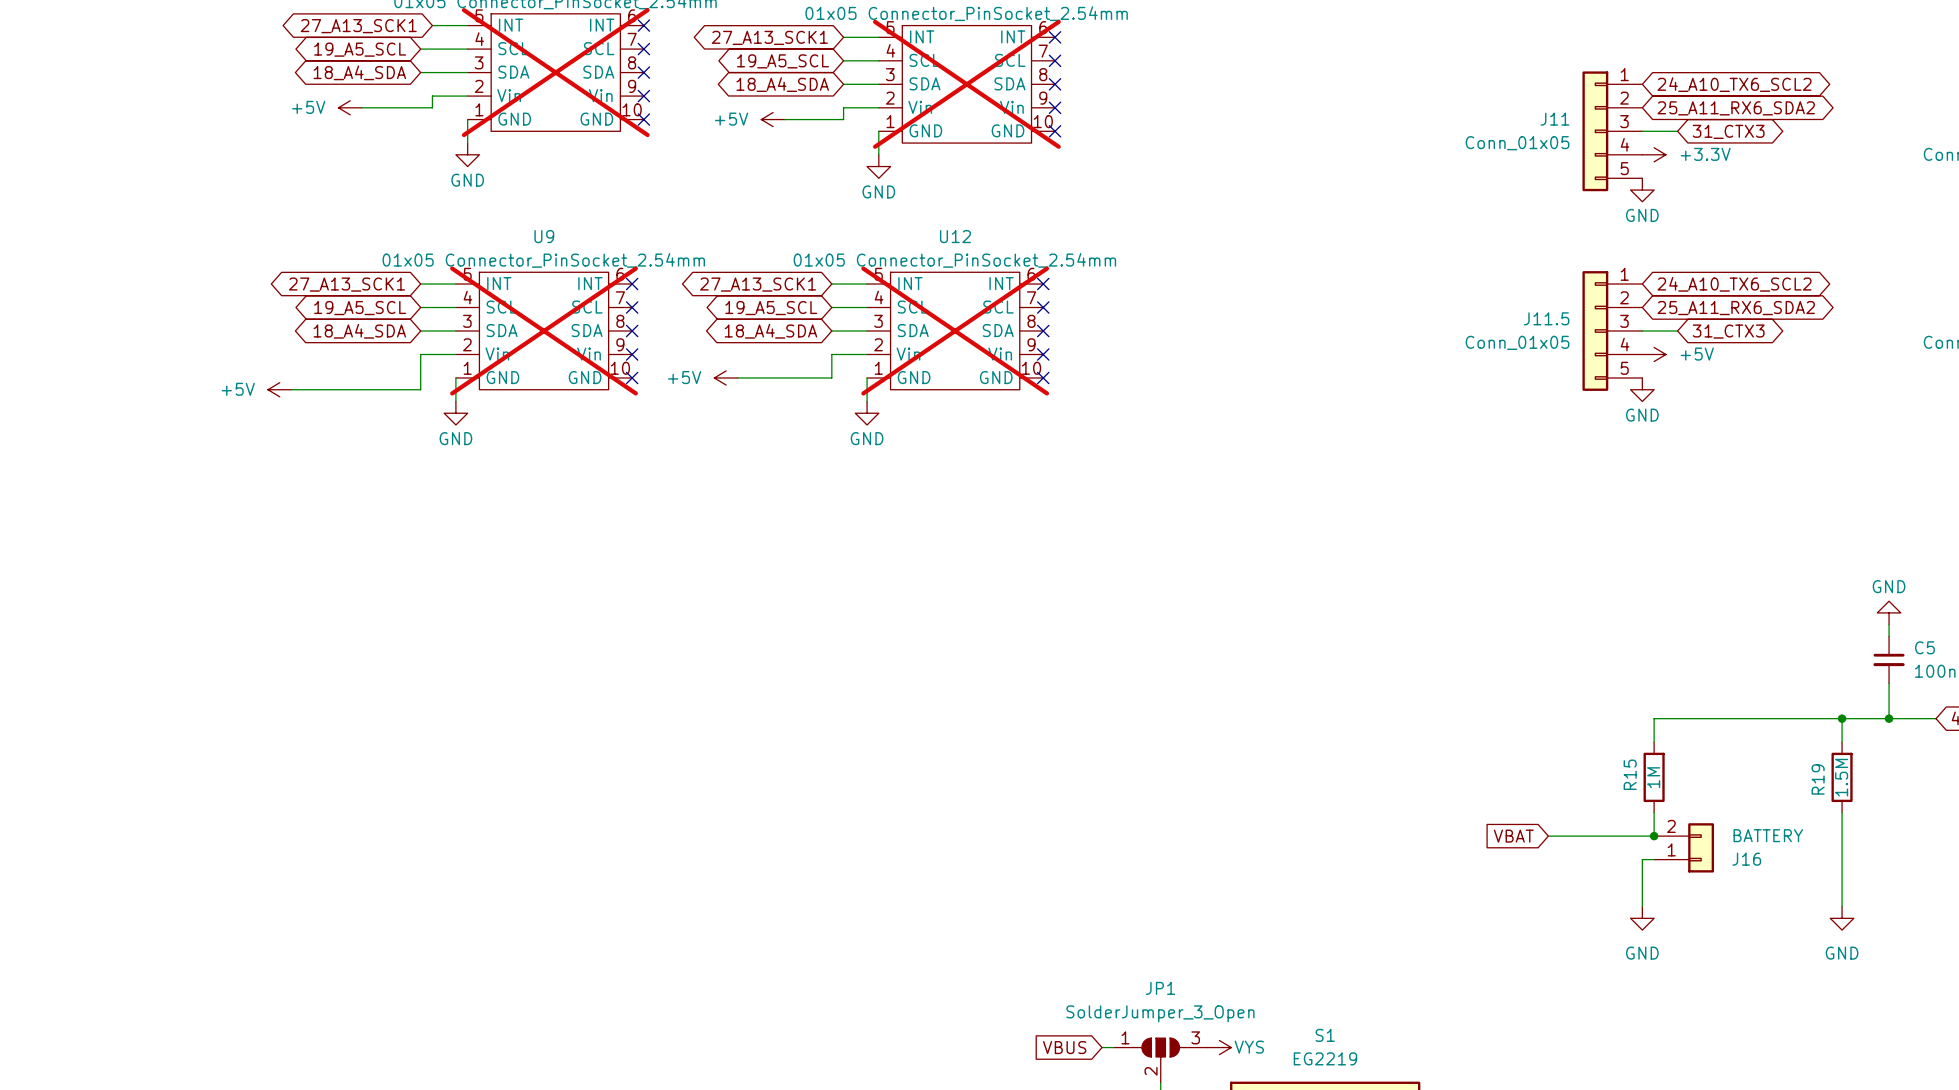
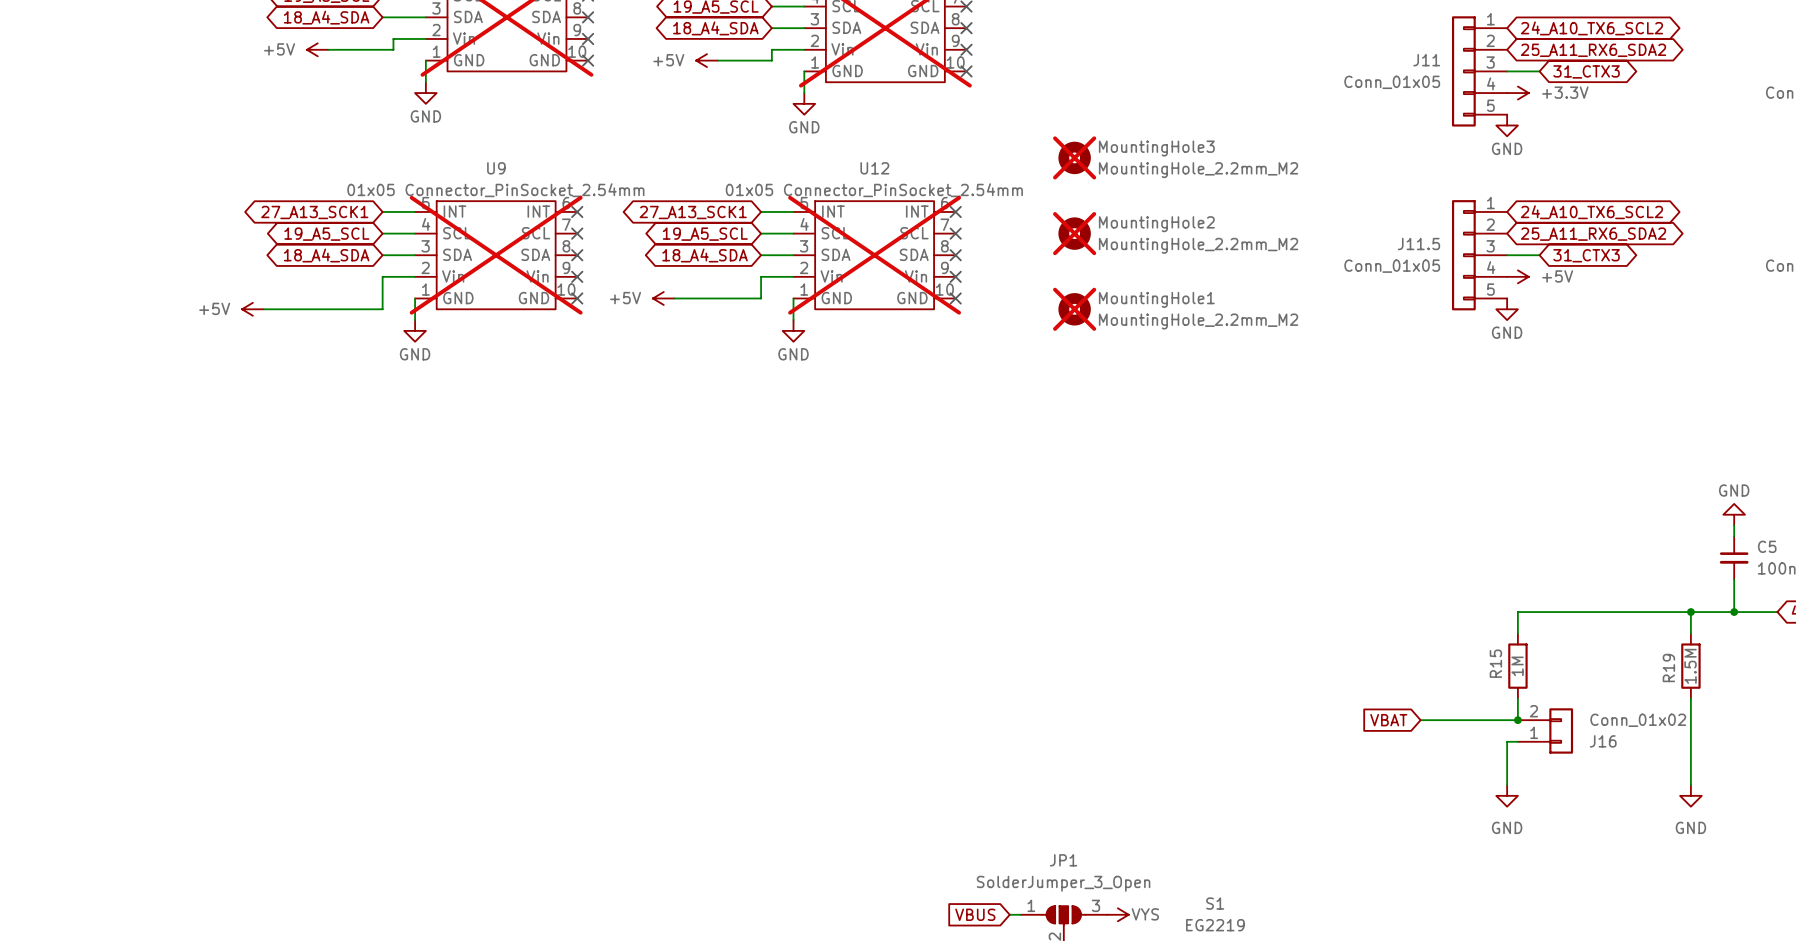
MountingHole3: none -> MountingHole_2.2mm_M2 (1074, 157)
MountingHole2: none -> MountingHole_2.2mm_M2 (1074, 233)
MountingHole1: none -> MountingHole_2.2mm_M2 (1074, 309)
J16 value: BATTERY (1768, 835) -> Conn_01x02 (1638, 720)

